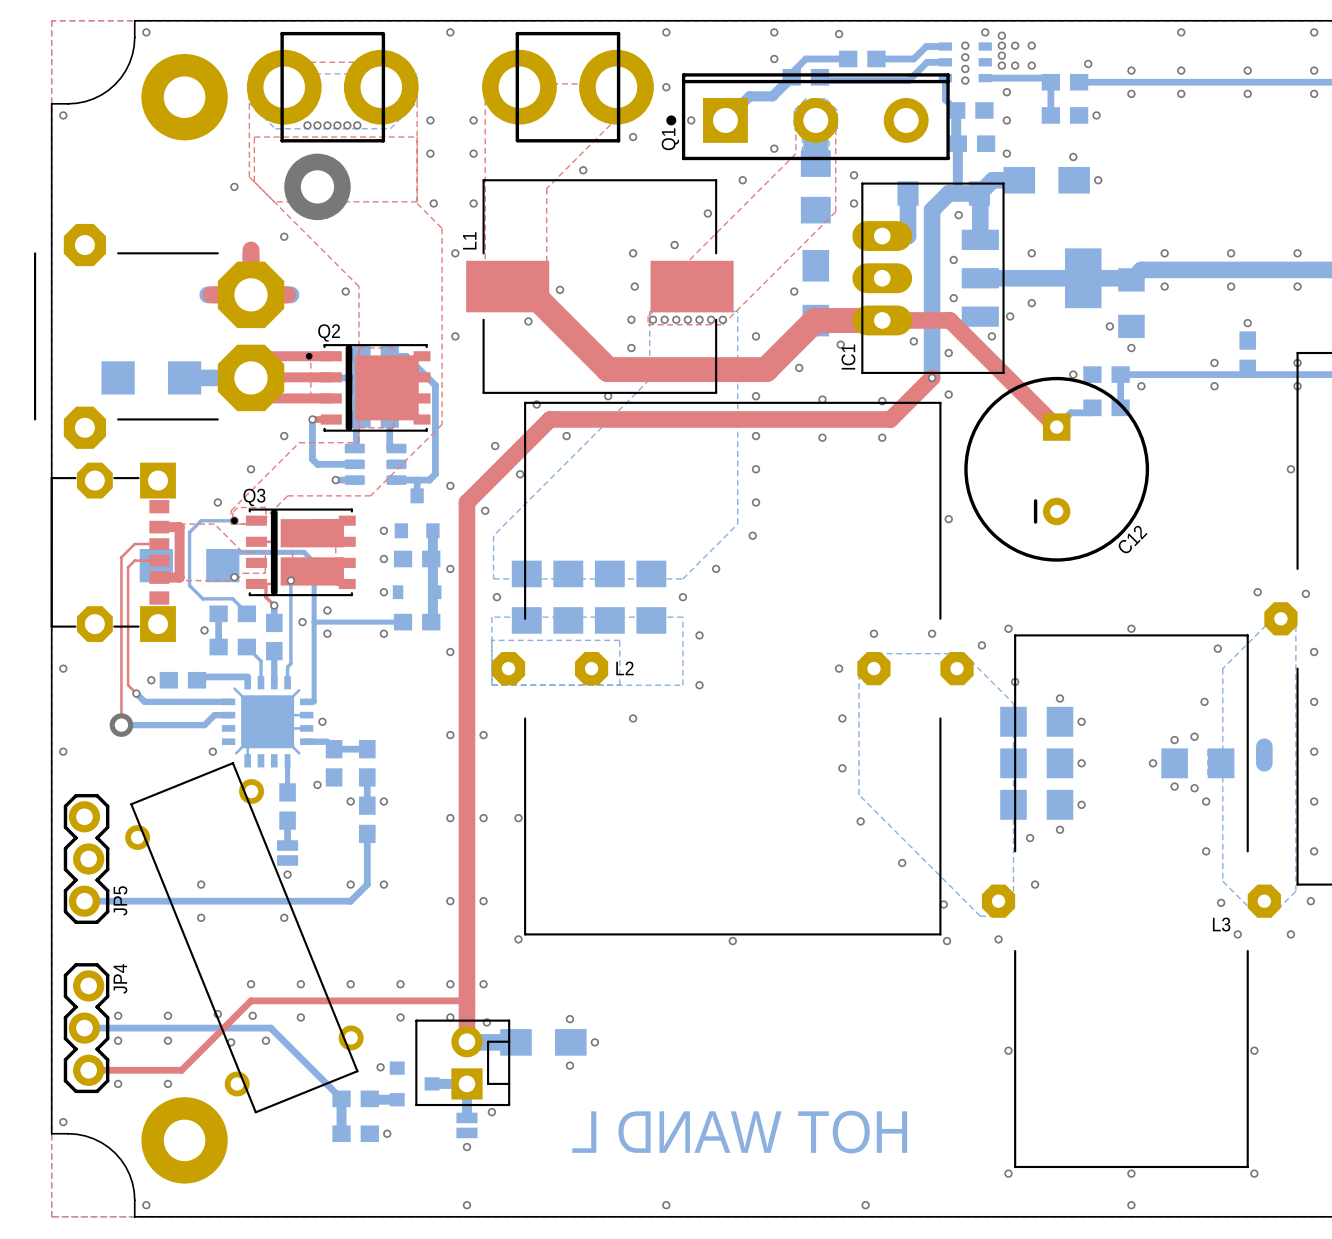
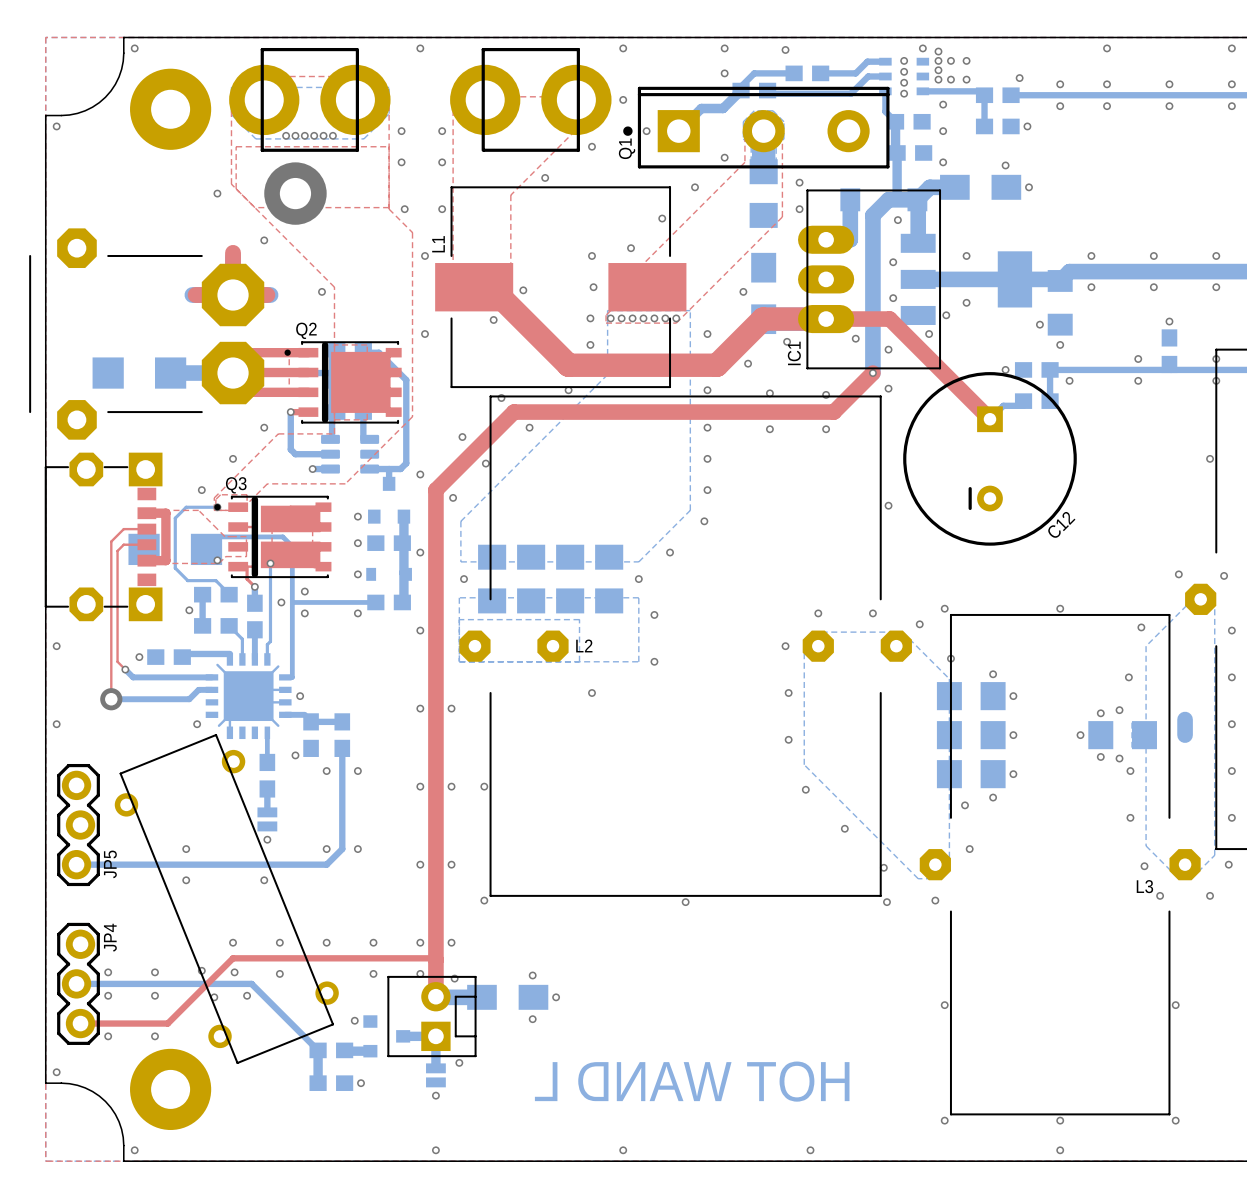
bottom track: none -> (342, 774) (342, 801)
part: (367, 819) -> none

